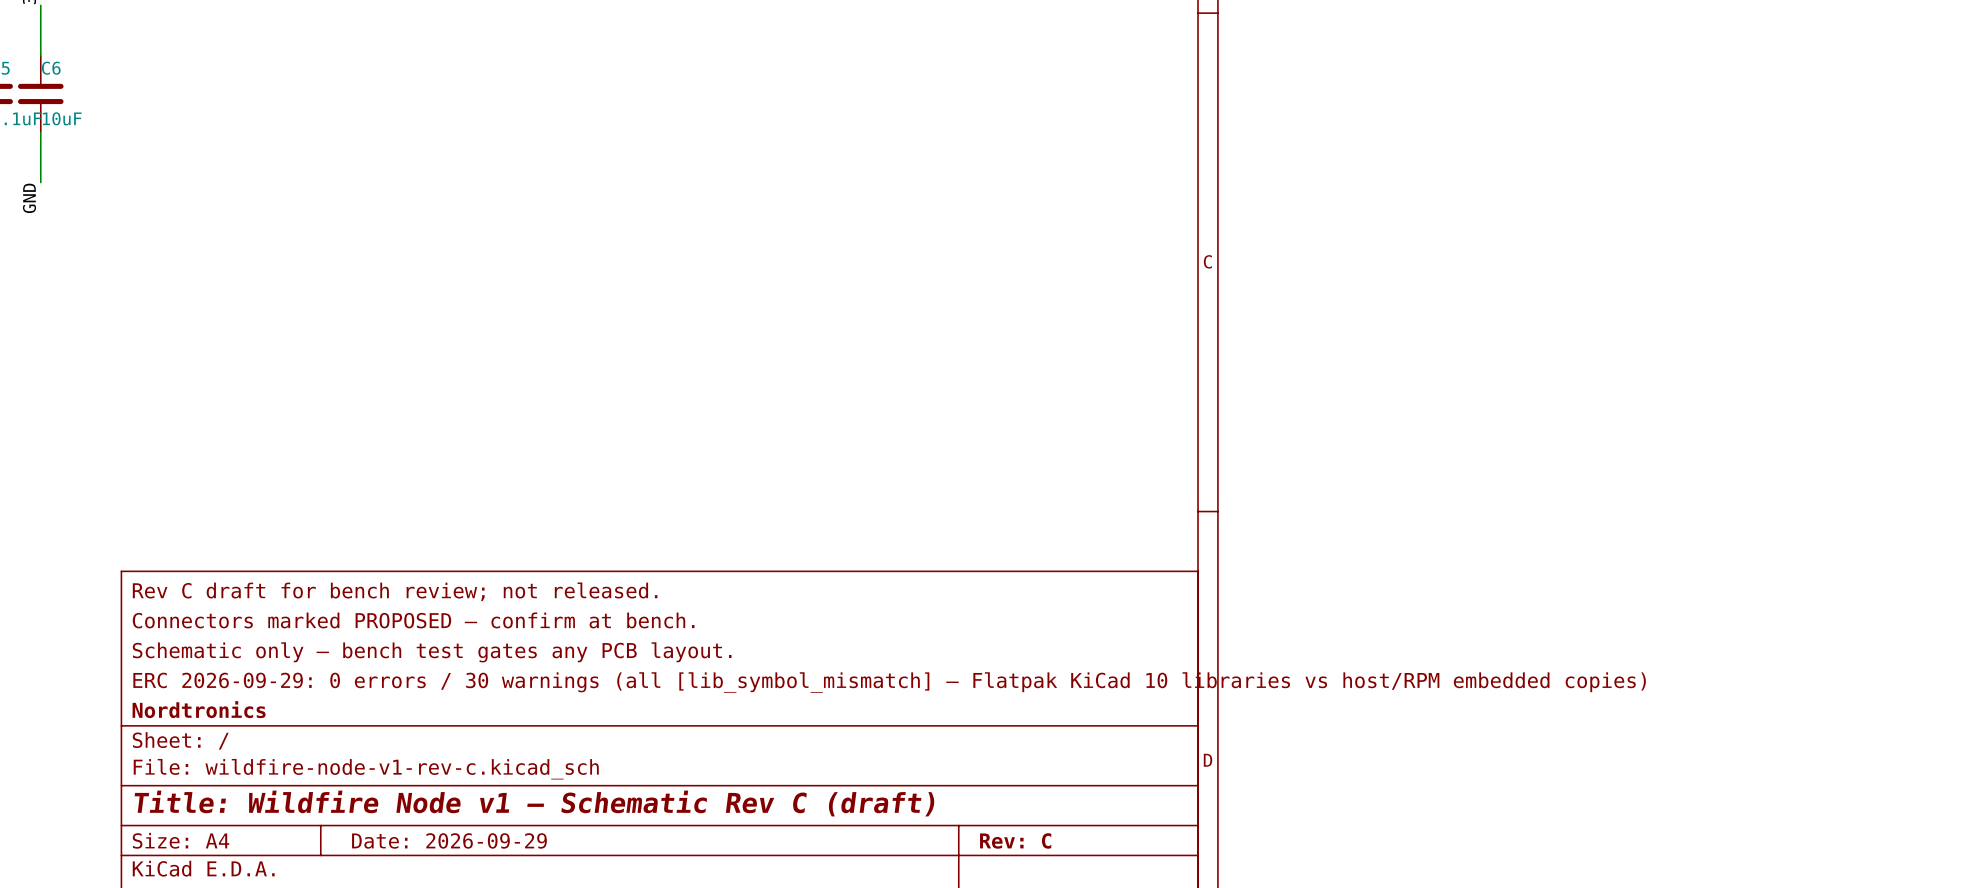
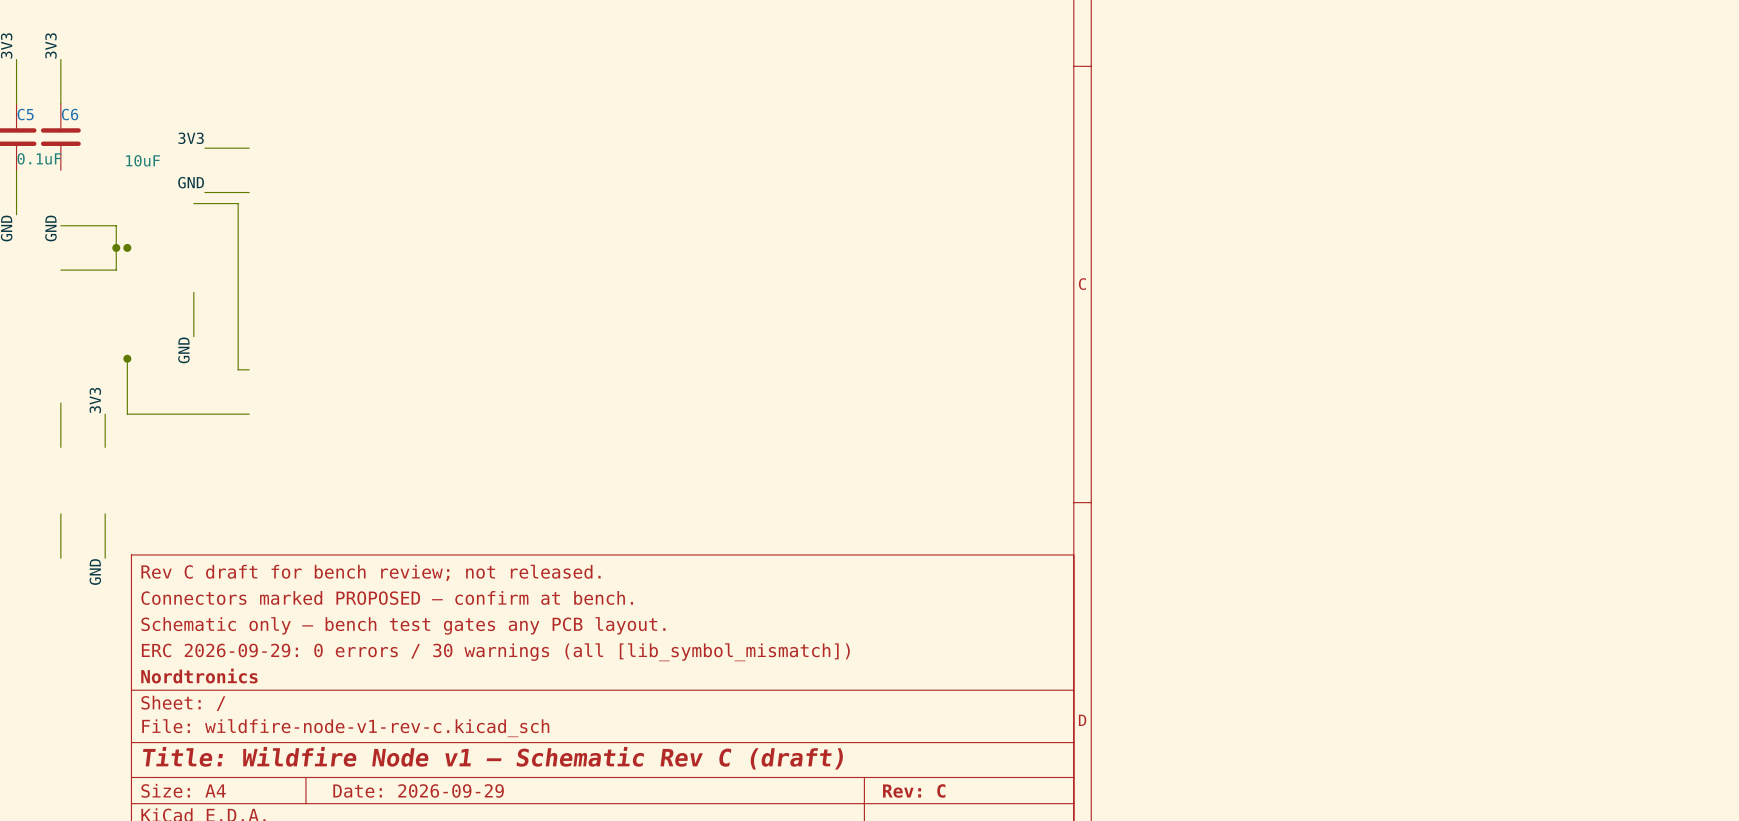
label: none -> 3V3 (191, 138)
wire: none -> (204, 148) (249, 148)
C6 value position: 10uF (62, 118) -> 10uF (143, 160)
wire: (40, 131) (40, 182) -> (193, 292) (193, 336)
label: none -> GND (191, 182)
wire: none -> (204, 192) (249, 192)
wire: none -> (193, 203) (238, 203) (238, 369) (249, 369)
wire: none -> (60, 225) (116, 225) (116, 270) (60, 270)
junction: none -> (116, 247)
junction: none -> (127, 247)
label: none -> GND (183, 350)
wire: none -> (127, 358) (127, 414) (249, 414)
junction: none -> (127, 358)
label: none -> 3V3 (95, 400)
wire: none -> (60, 403) (60, 447)
wire: none -> (105, 414) (105, 447)
wire: none -> (60, 513) (60, 558)
wire: none -> (105, 513) (105, 558)
label: none -> GND (95, 572)
title block: ERC 2026-09-29: 0 errors / 30 warnings (all [lib_symbol_mismatch] — Flatpak KiCad 10 libraries vs host/RPM embedded copies) (889, 682) -> ERC 2026-09-29: 0 errors / 30 warnings (all [lib_symbol_mismatch]) (495, 652)

